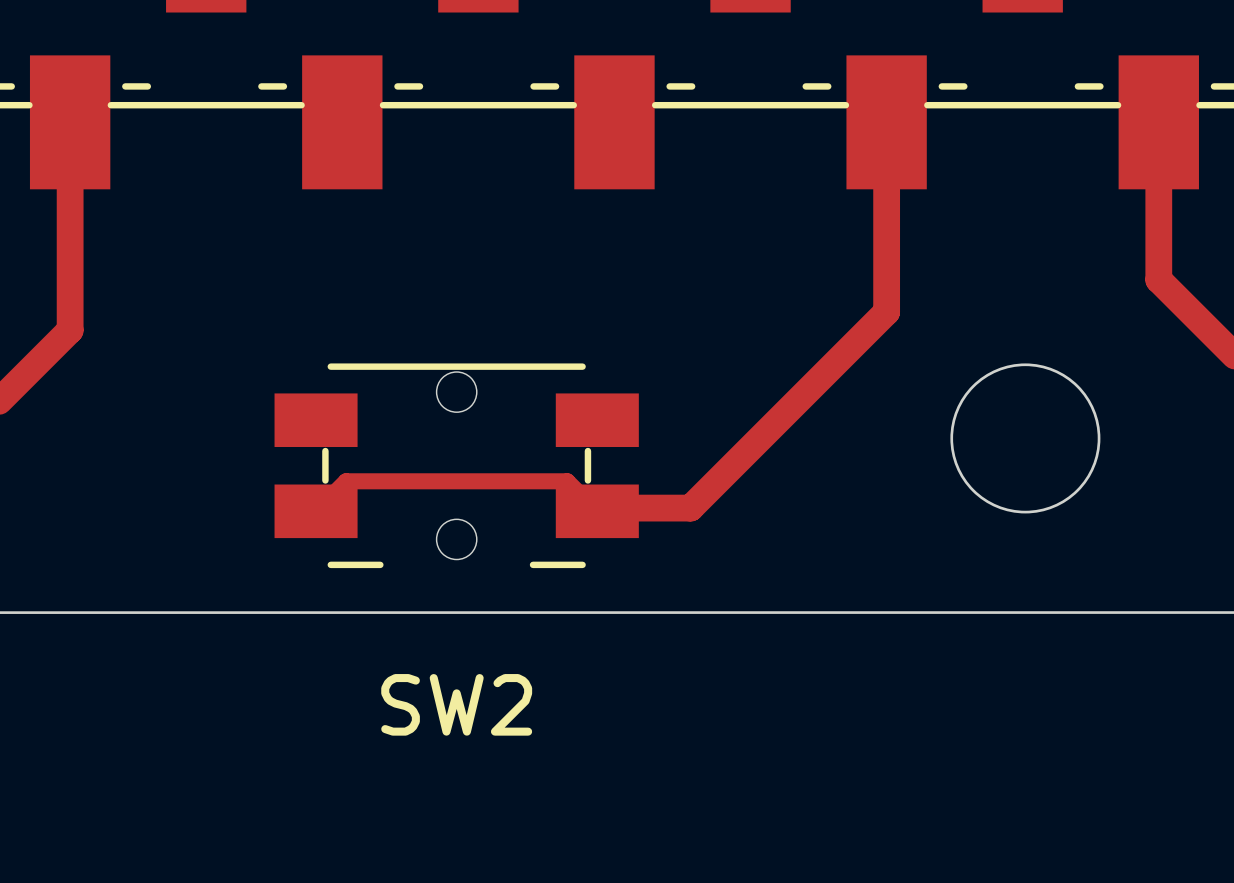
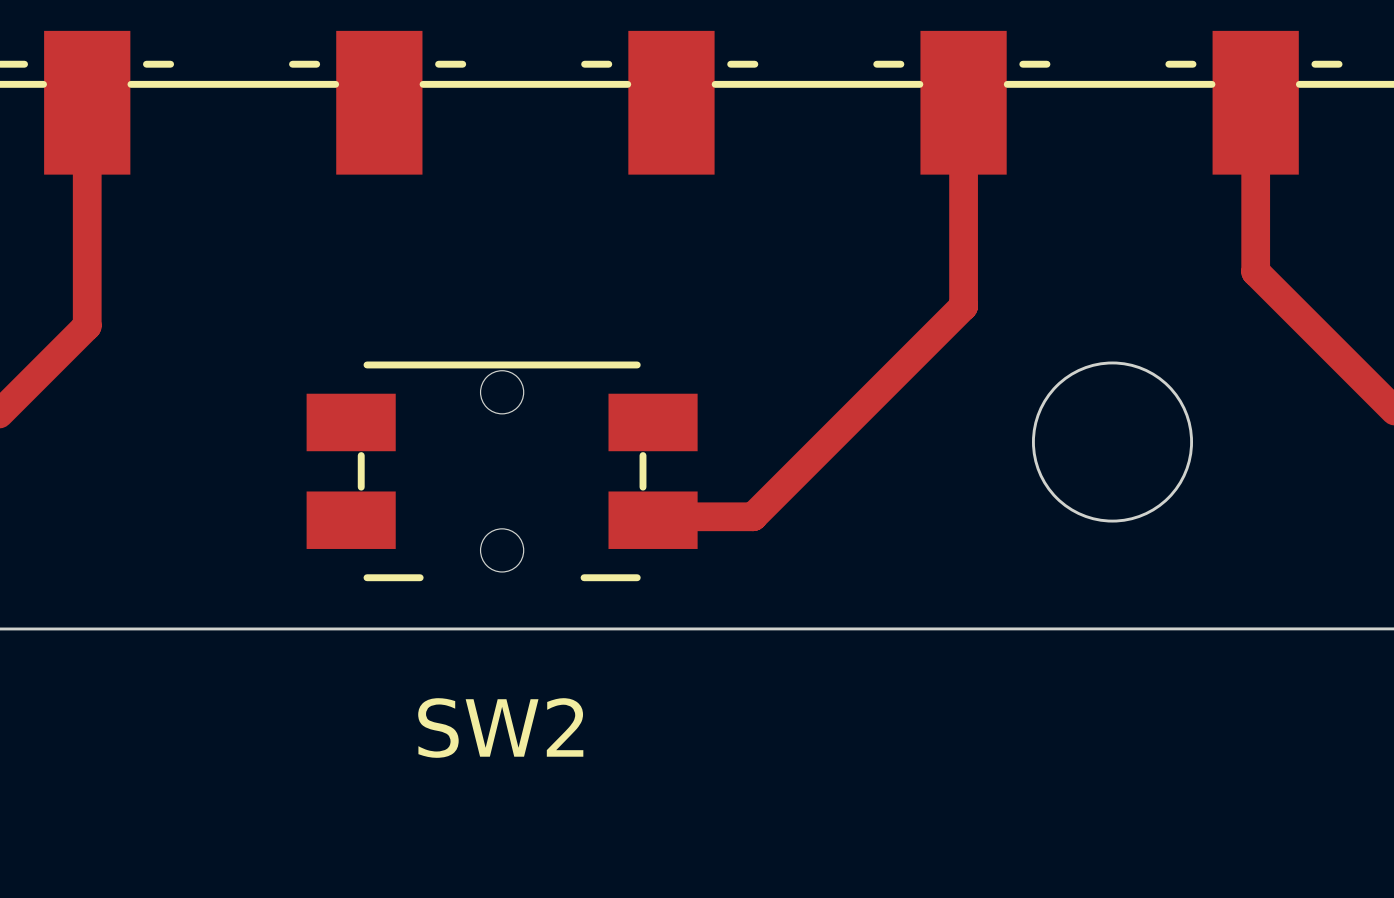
track: (316, 511) (346, 481) (567, 481) (597, 511) -> none

